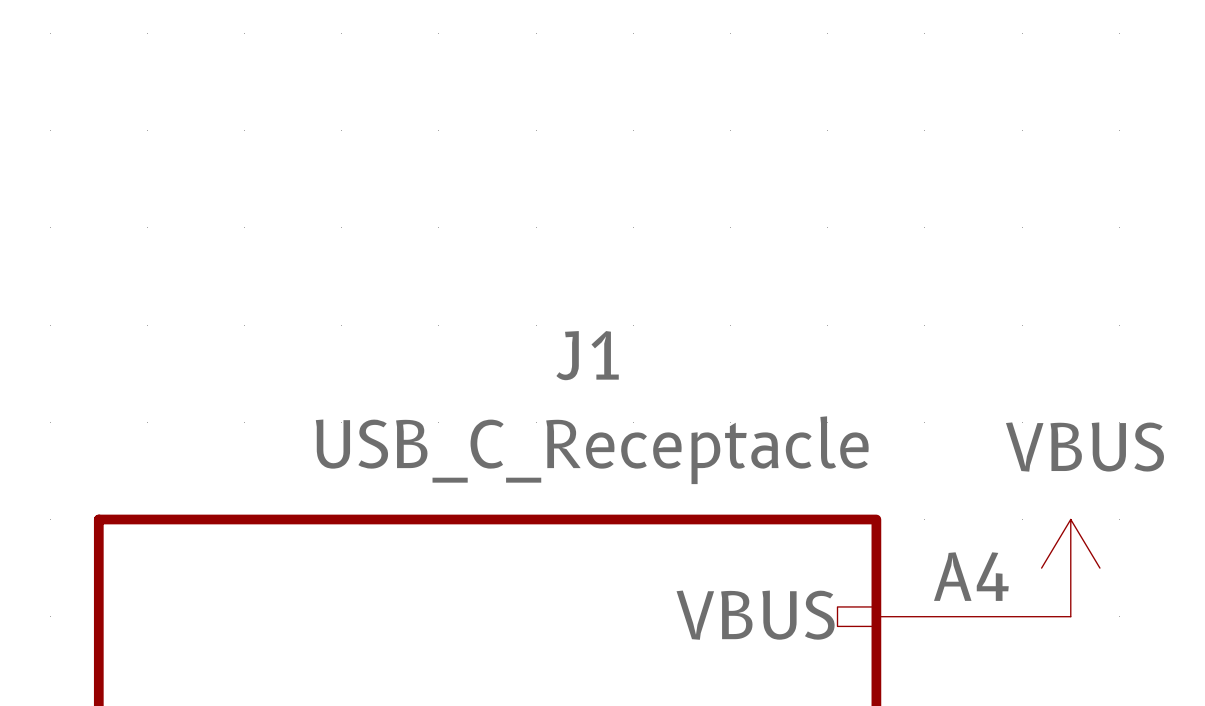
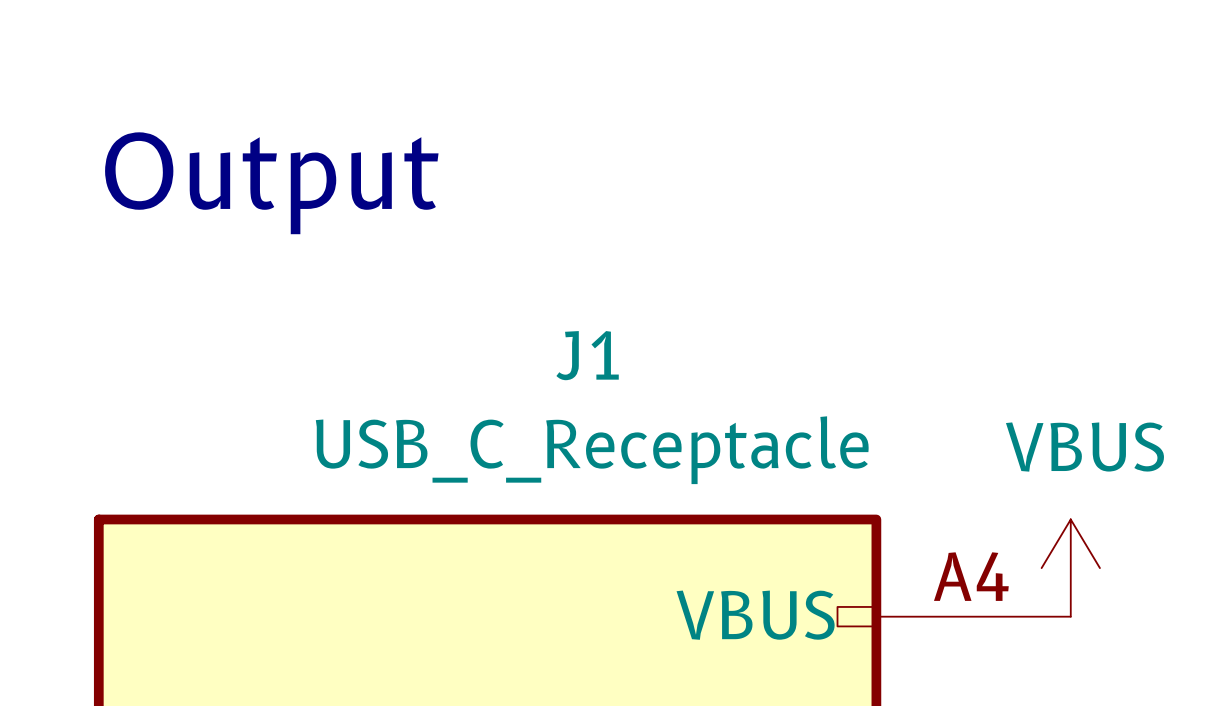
text: none -> Output (271, 183)

